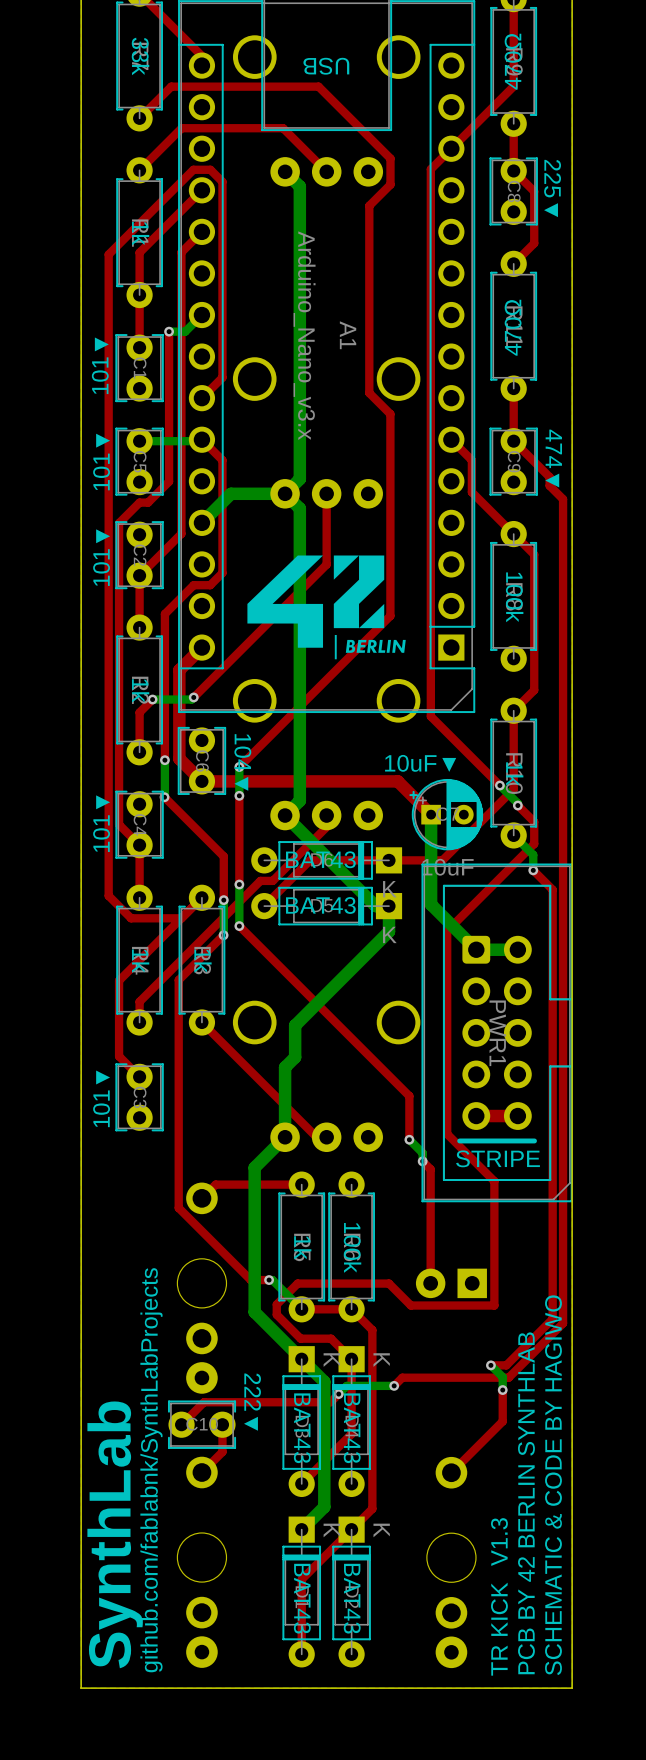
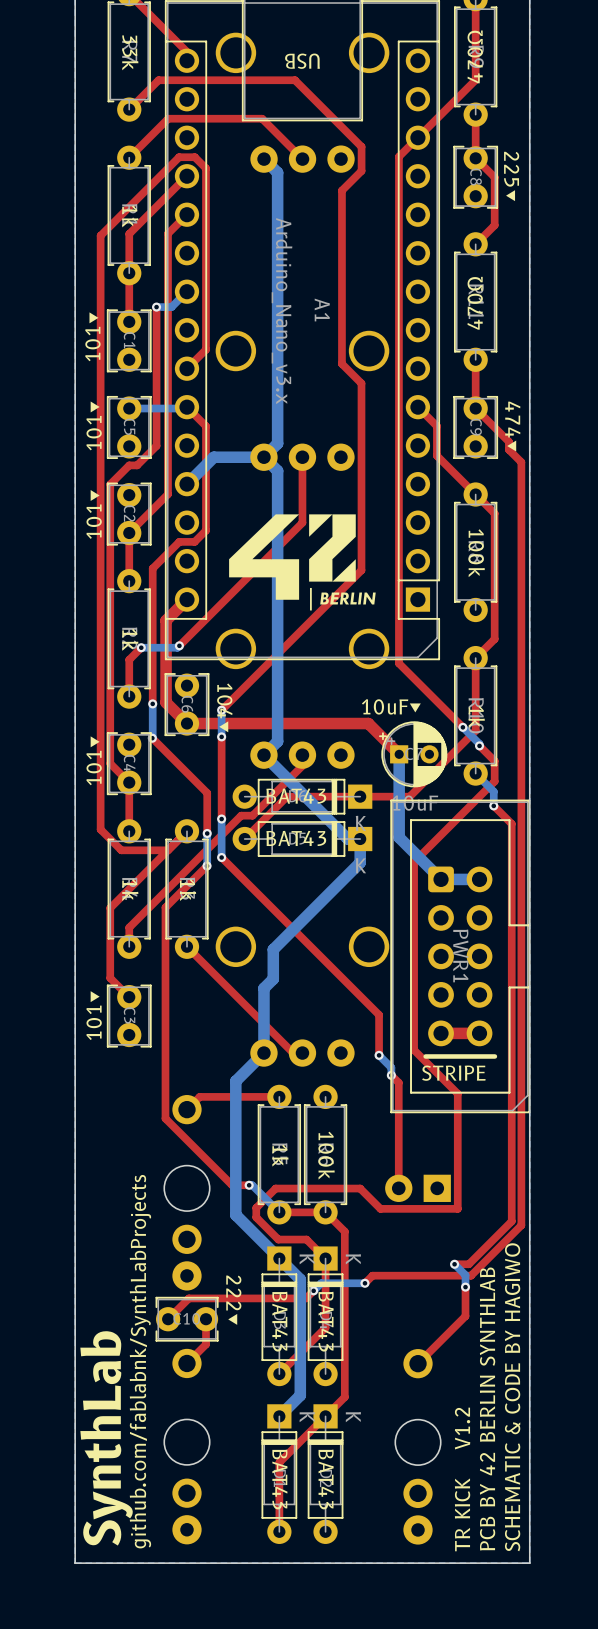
text: V1.3 (499, 1542) -> V1.2 (462, 1428)

